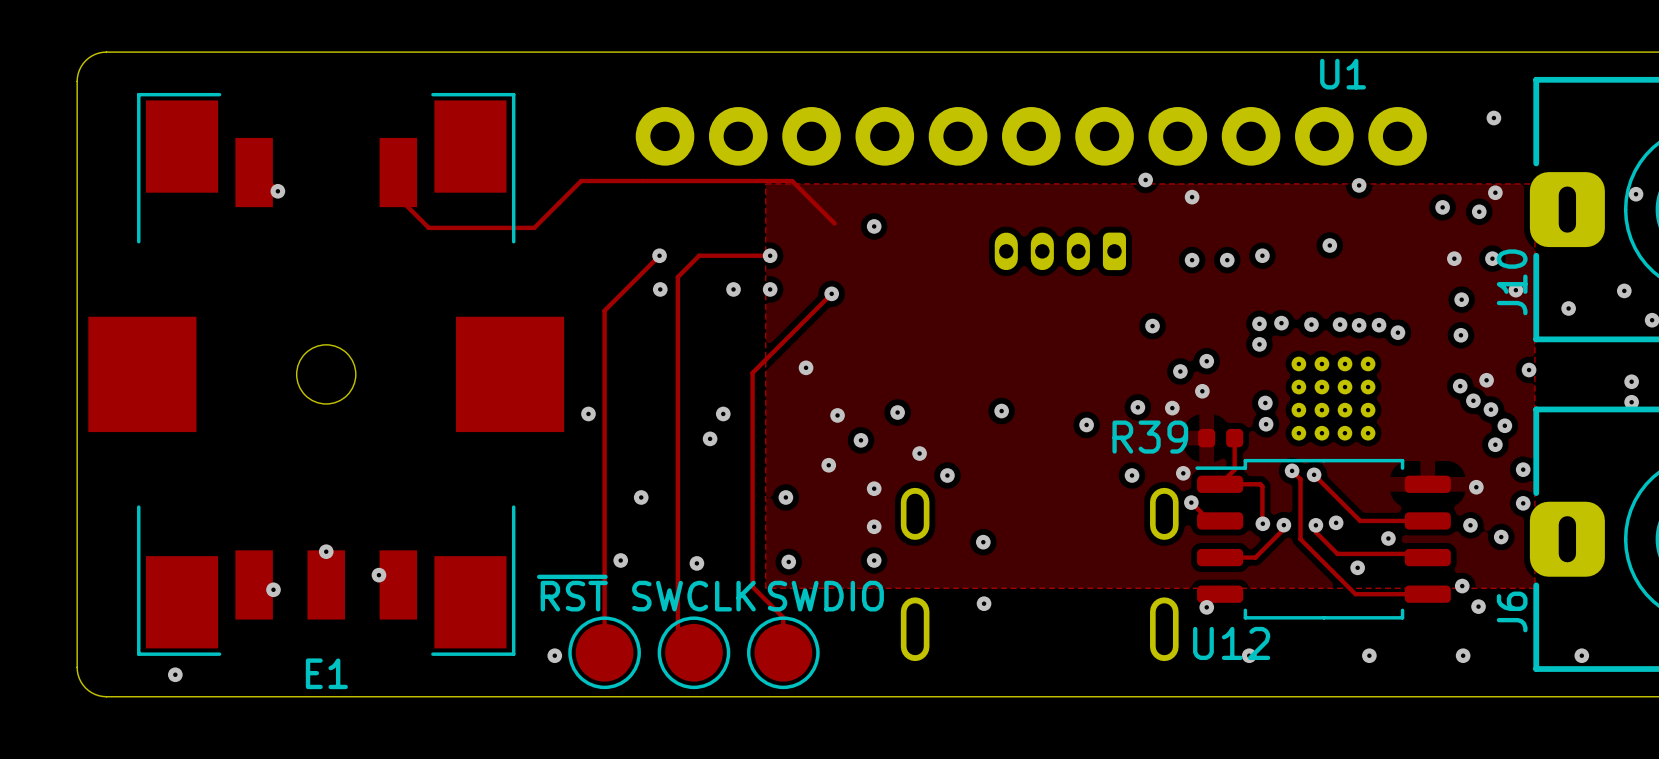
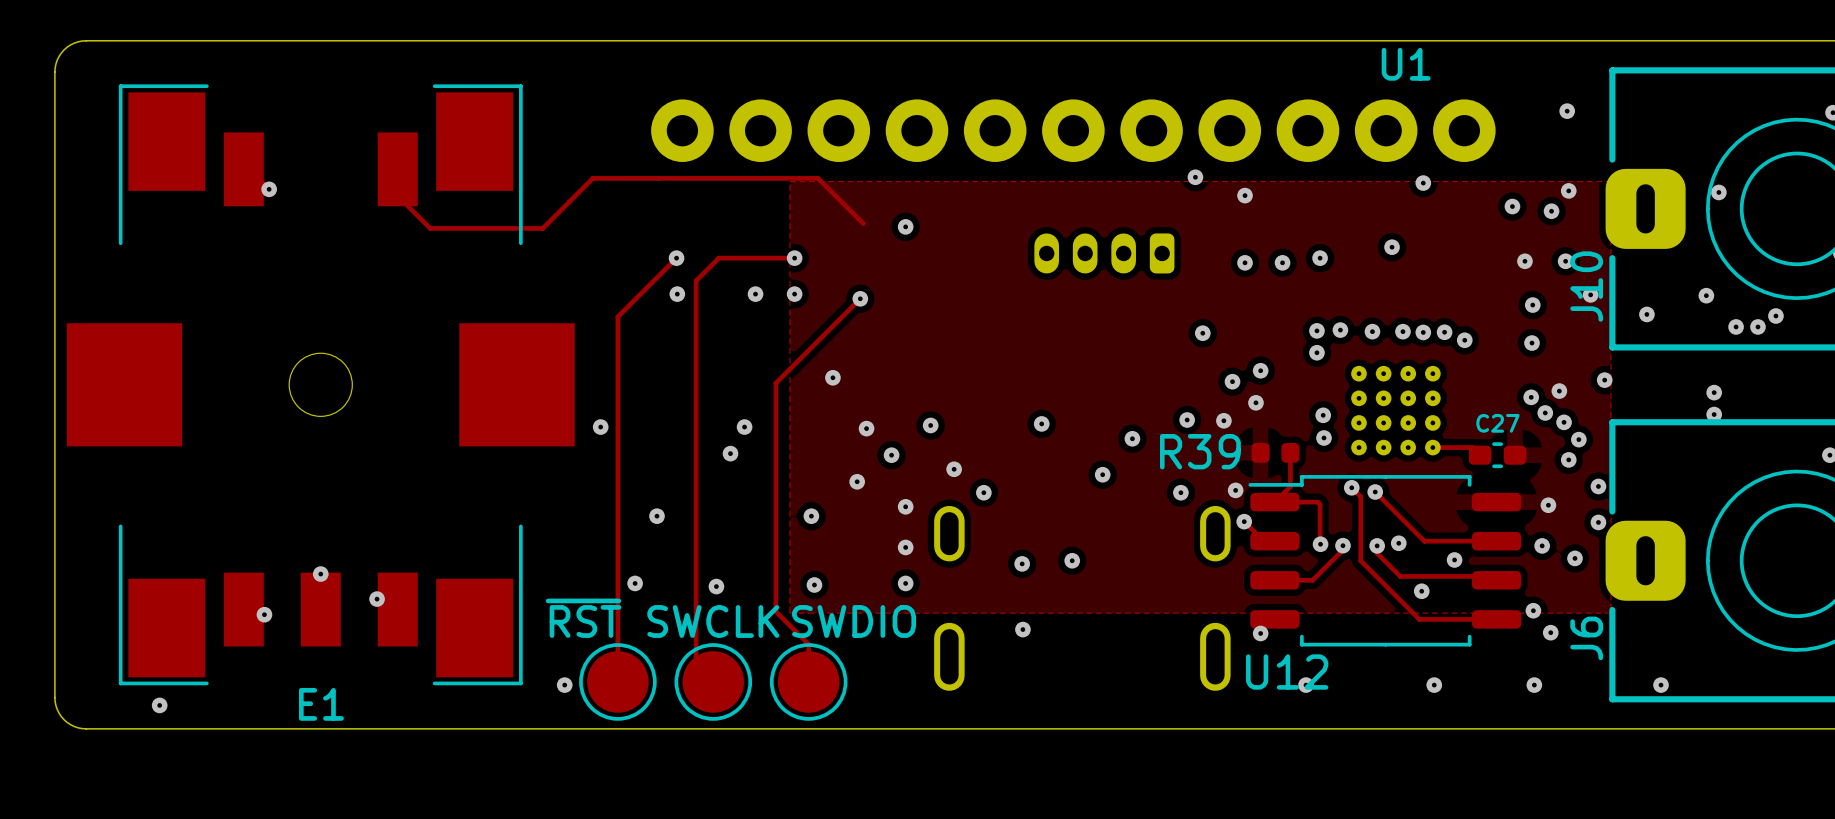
track: none -> (1432, 447) (1472, 447) (1480, 455)
C27: none -> (1497, 455)
via: none -> (1102, 474)
via: none -> (1072, 560)

